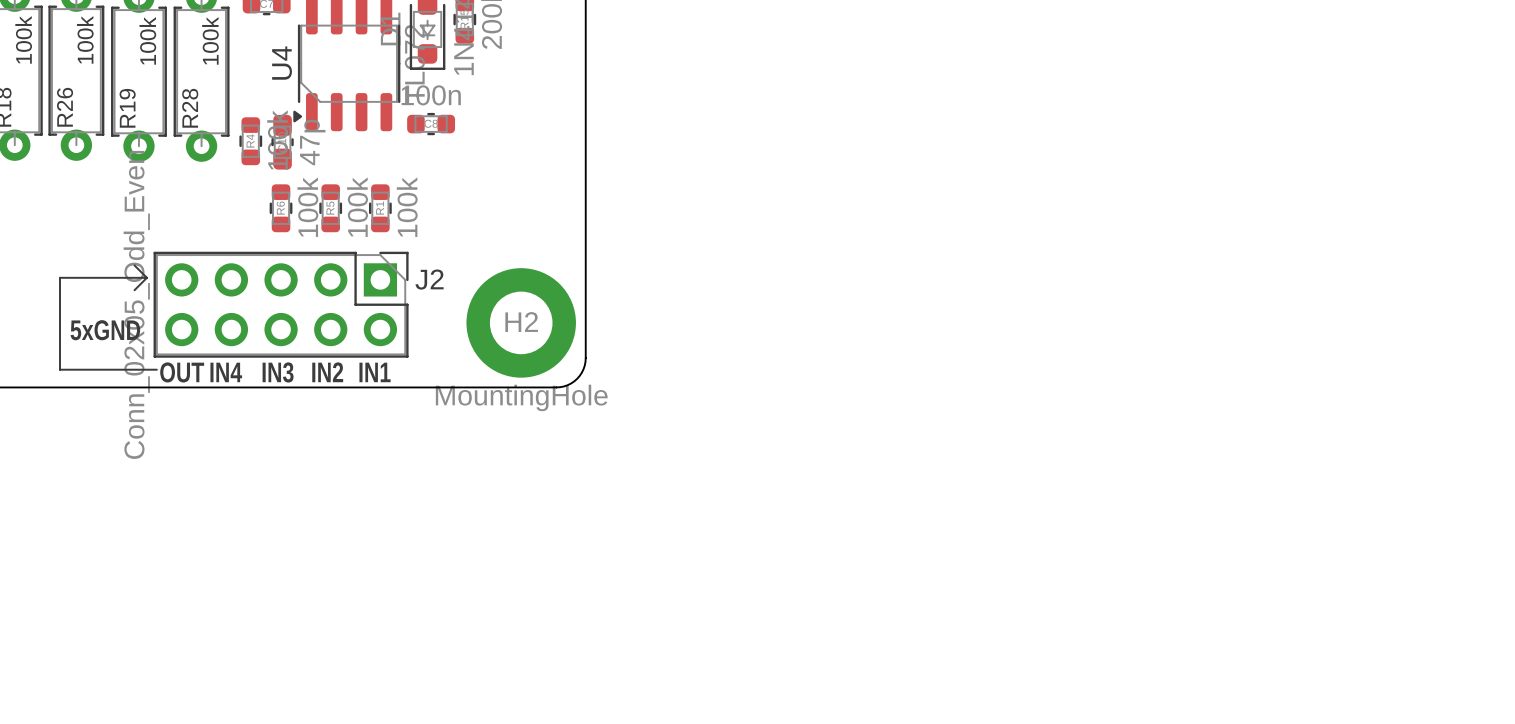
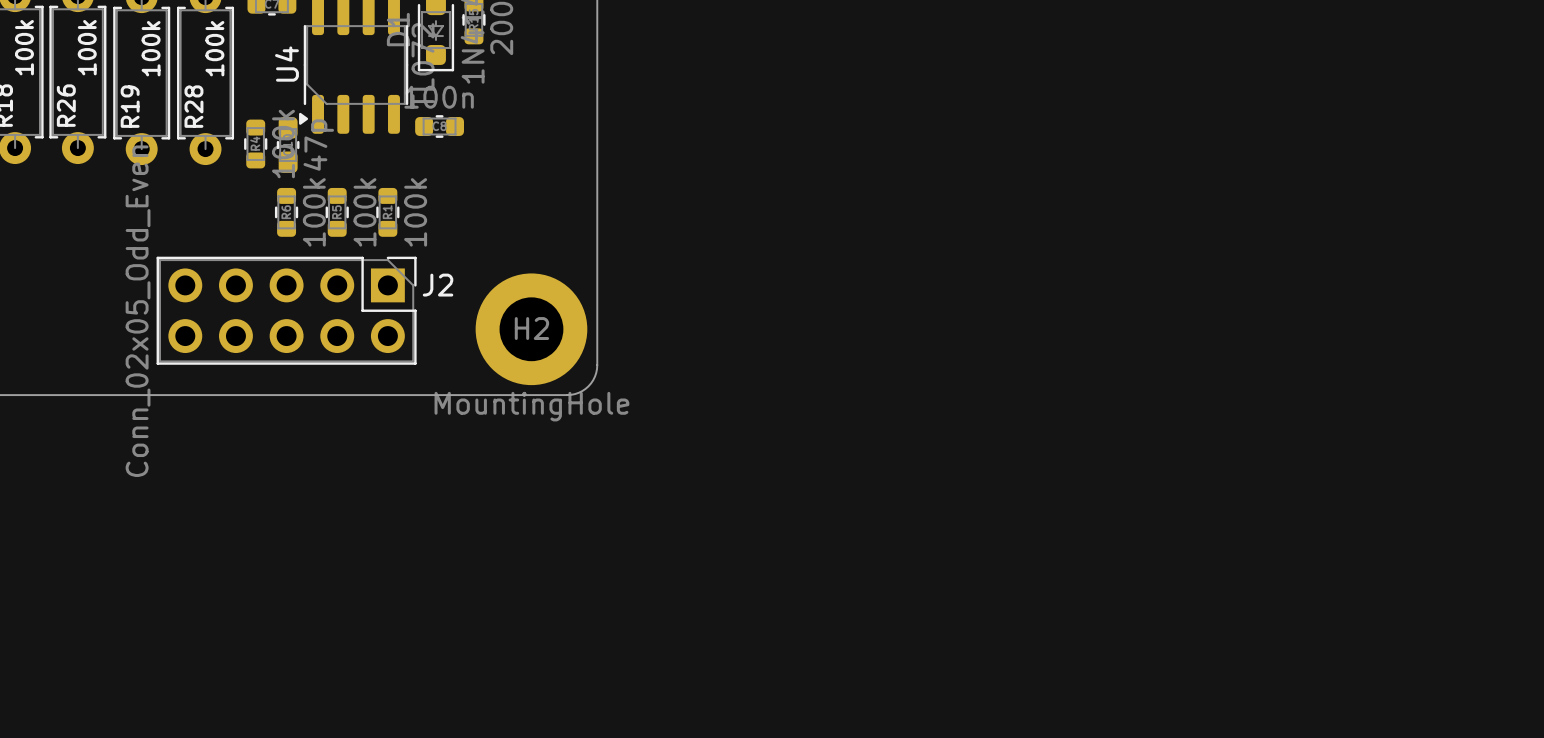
line: (134, 265) (146, 277) -> none
line: (146, 277) (59, 277) (59, 369) (156, 369) -> none
line: (146, 277) (134, 290) -> none
text: 5xGND (105, 330) -> none
text: OUT (182, 372) -> none
text: IN4 (226, 372) -> none
text: IN3 (278, 372) -> none
text: IN2 (327, 372) -> none
text: IN1 (375, 372) -> none

